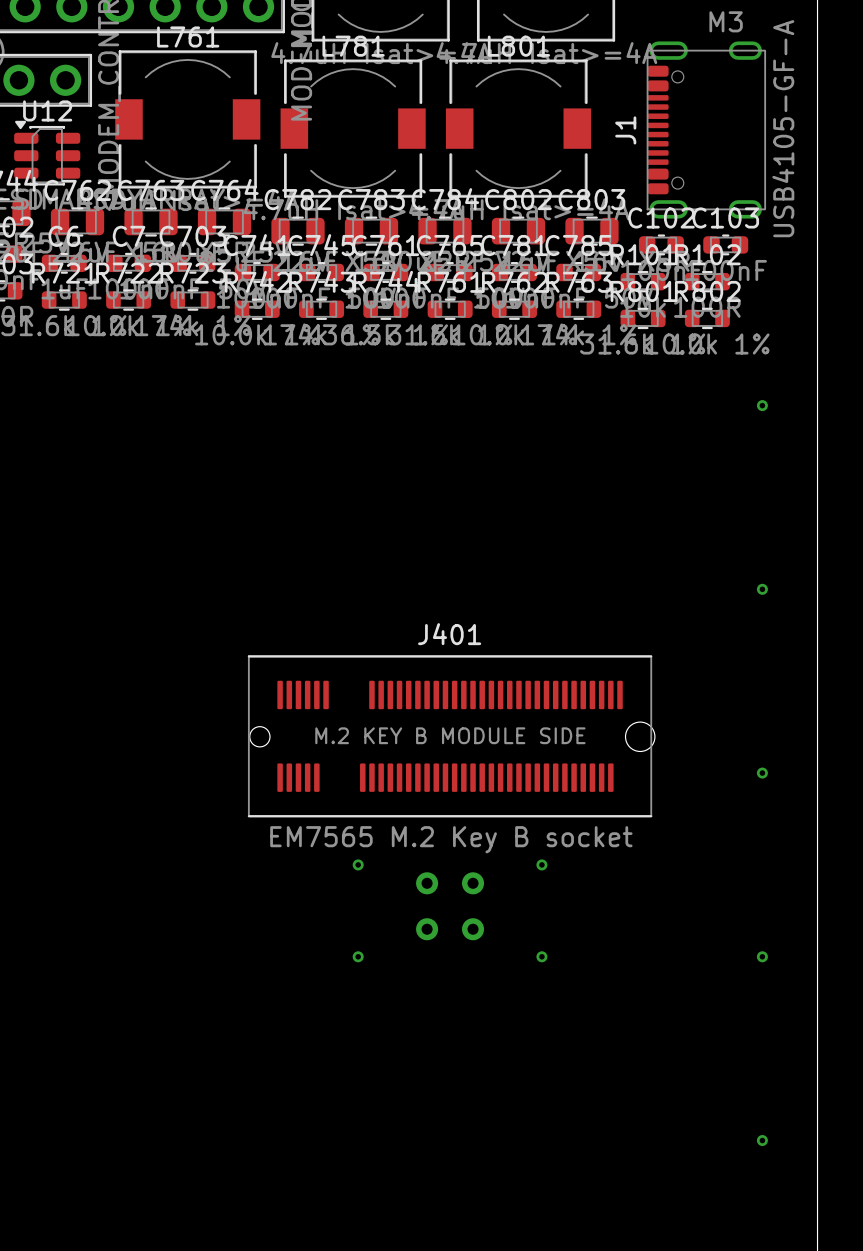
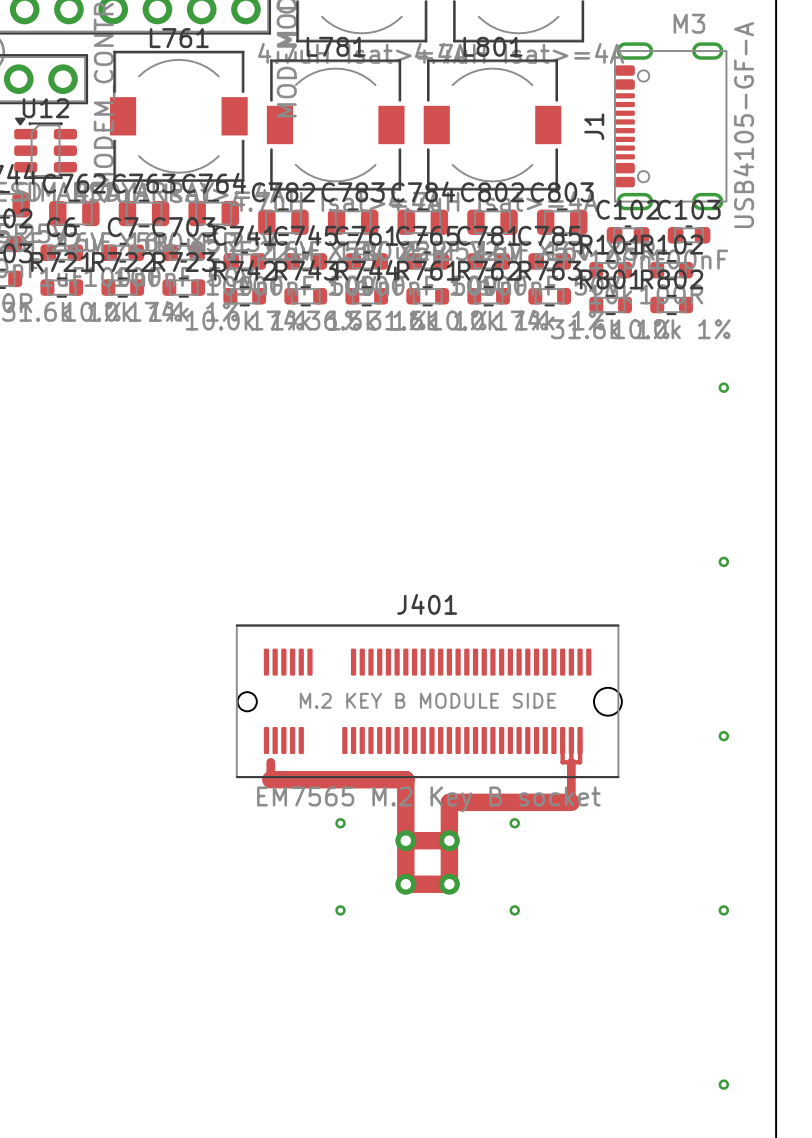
top track: none -> (562, 740) (562, 762) (580, 762) (580, 740)
top track: none -> (571, 740) (571, 802) (449, 802) (449, 884) (405, 884) (405, 779) (270, 779) (270, 762)
top track: none -> (405, 840) (449, 840)

